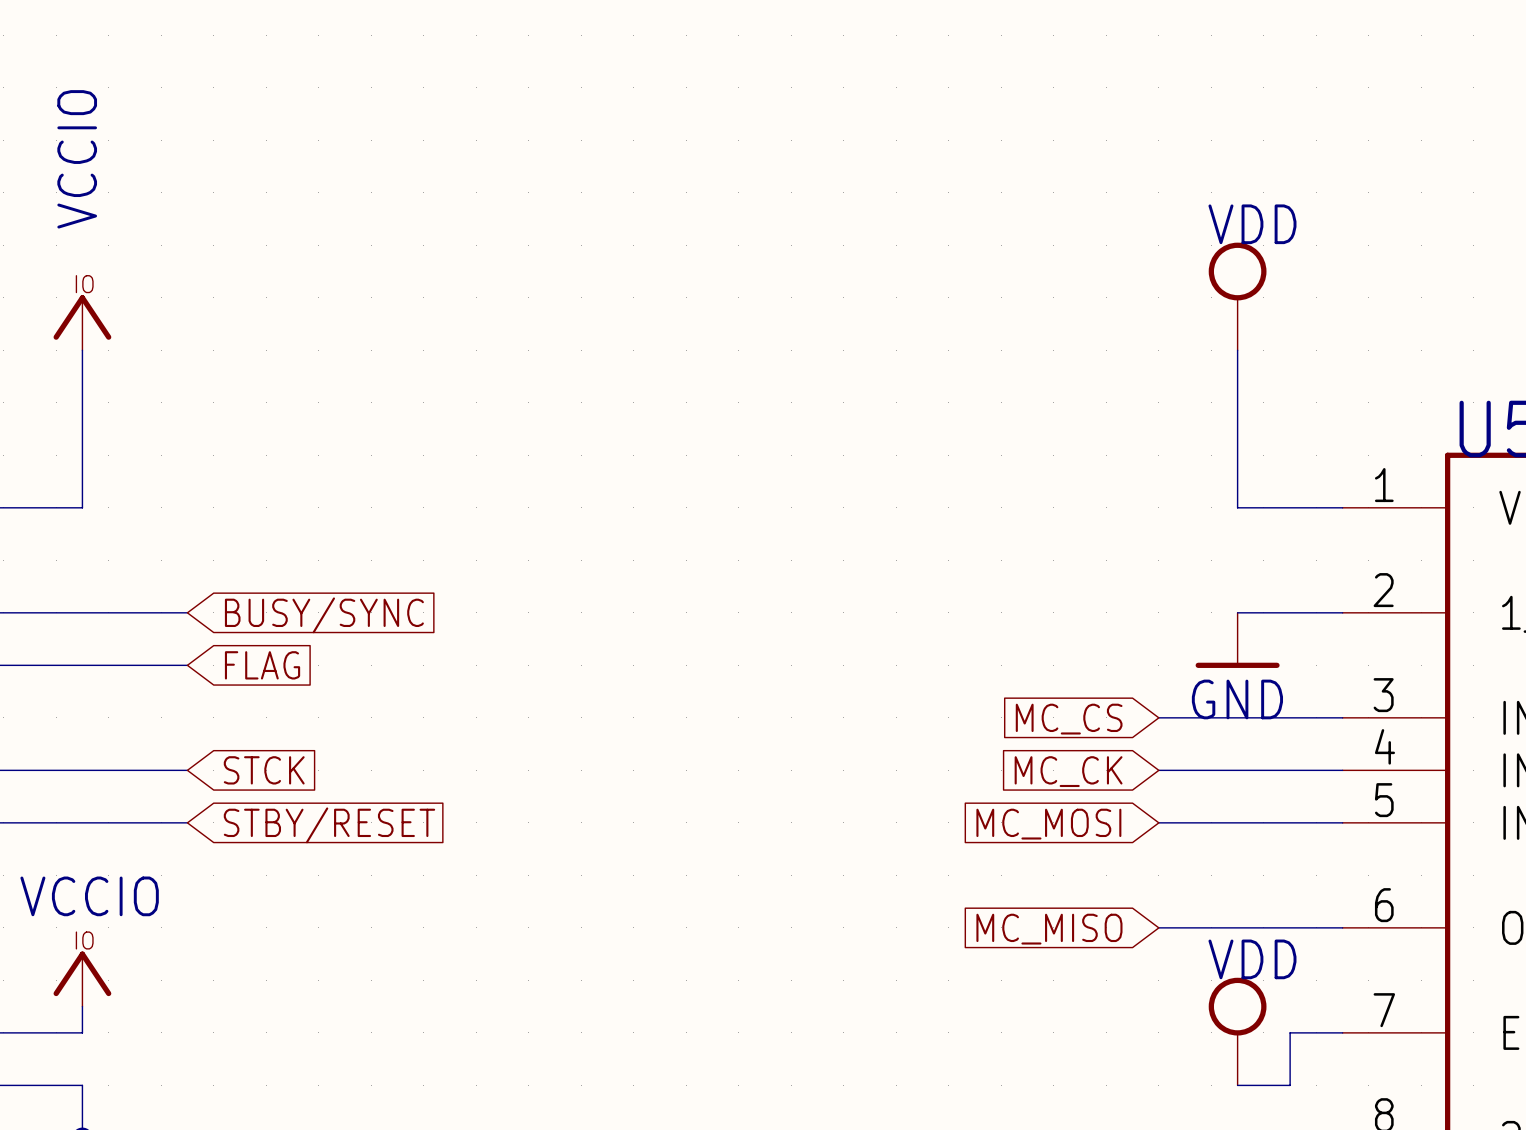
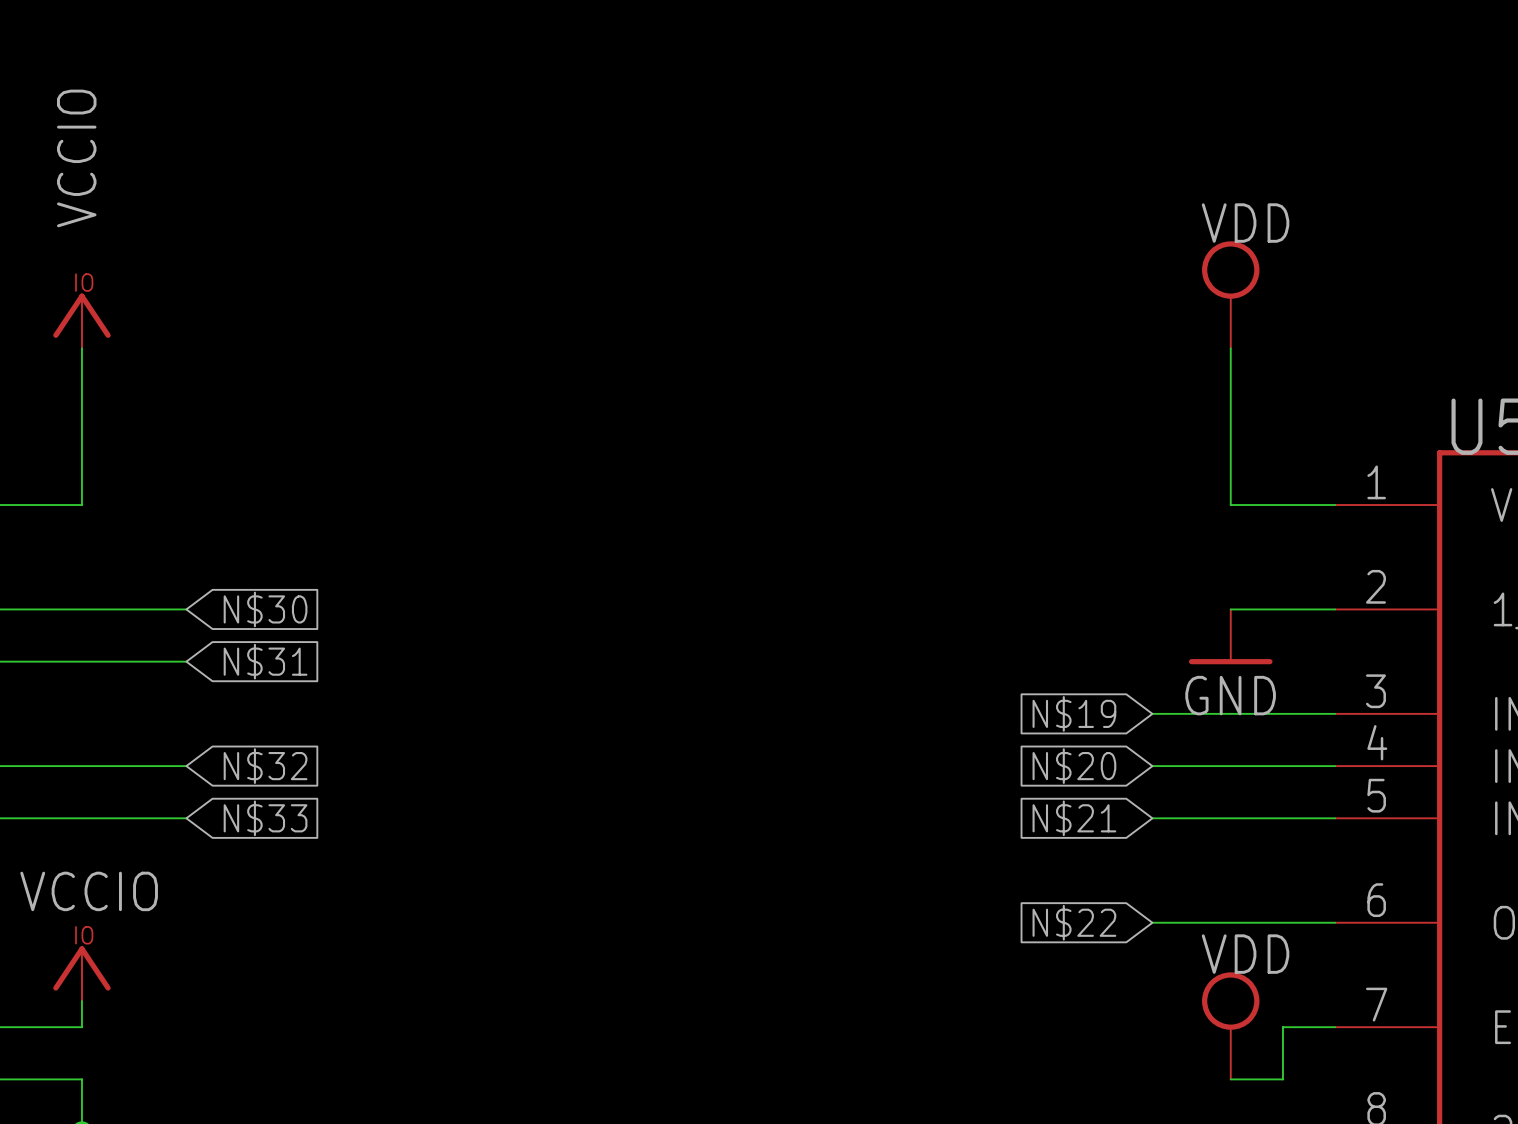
global label: BUSY/SYNC (324, 615) -> N$30 (265, 609)
global label: FLAG (262, 665) -> N$31 (265, 661)
global label: MC_CS (1069, 719) -> N$19 (1074, 713)
global label: STCK (264, 770) -> N$32 (265, 766)
global label: MC_CK (1068, 771) -> N$20 (1074, 766)
global label: MC_MOSI (1048, 824) -> N$21 (1074, 818)
global label: STBY/RESET (329, 825) -> N$33 (265, 818)
global label: MC_MISO (1049, 929) -> N$22 (1074, 922)

